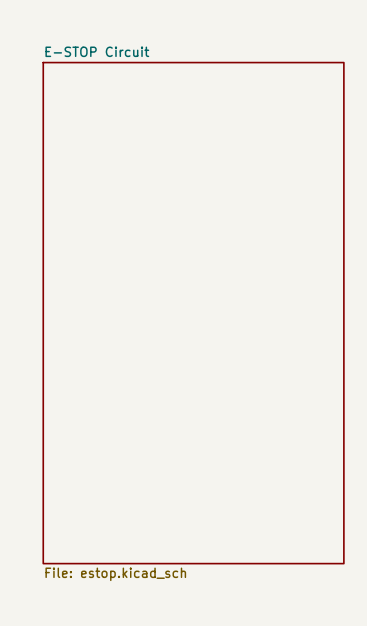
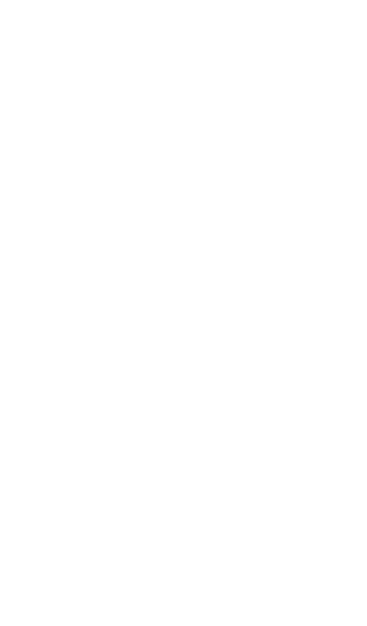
sheet E-STOP Circuit: File: estop.kicad_sch (193, 313) -> none

